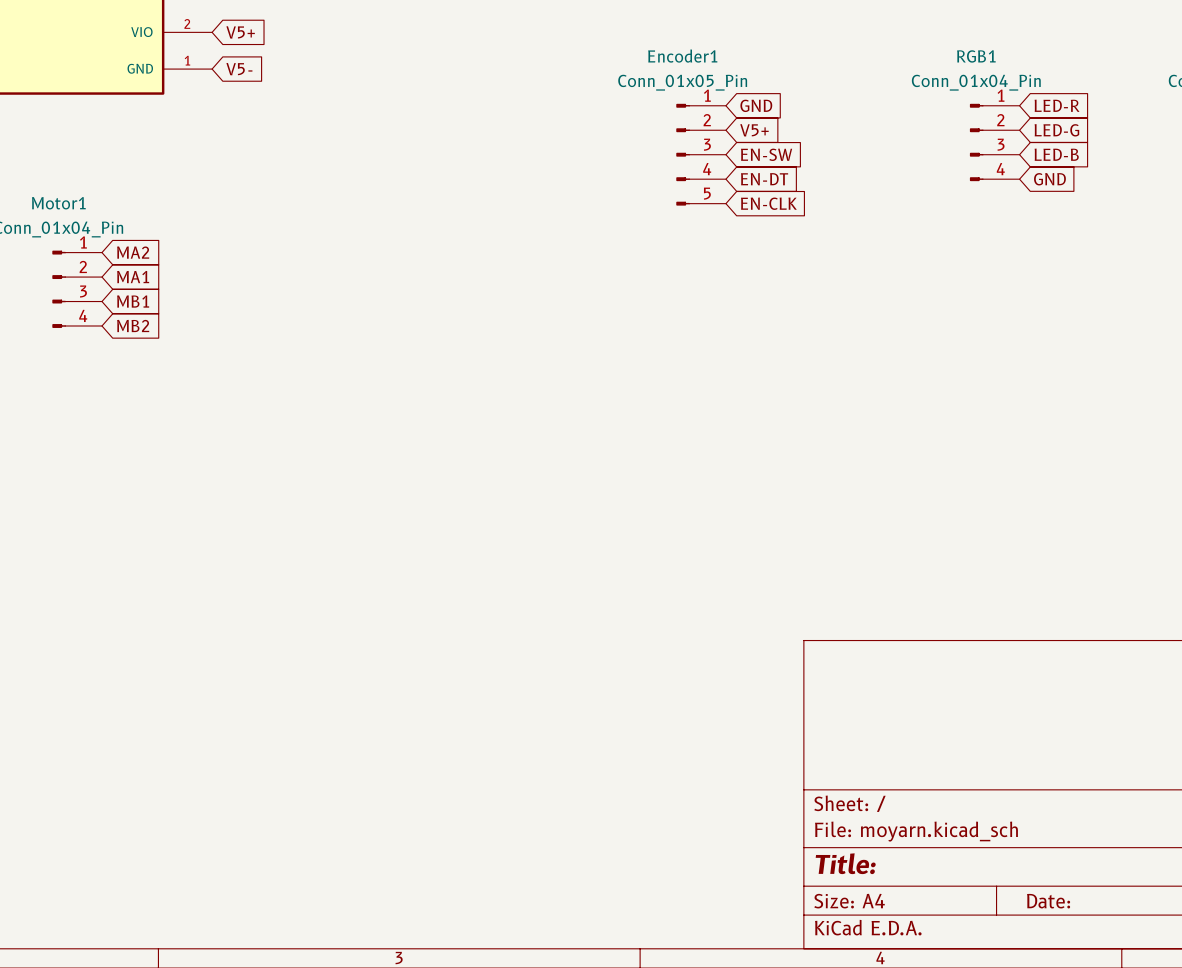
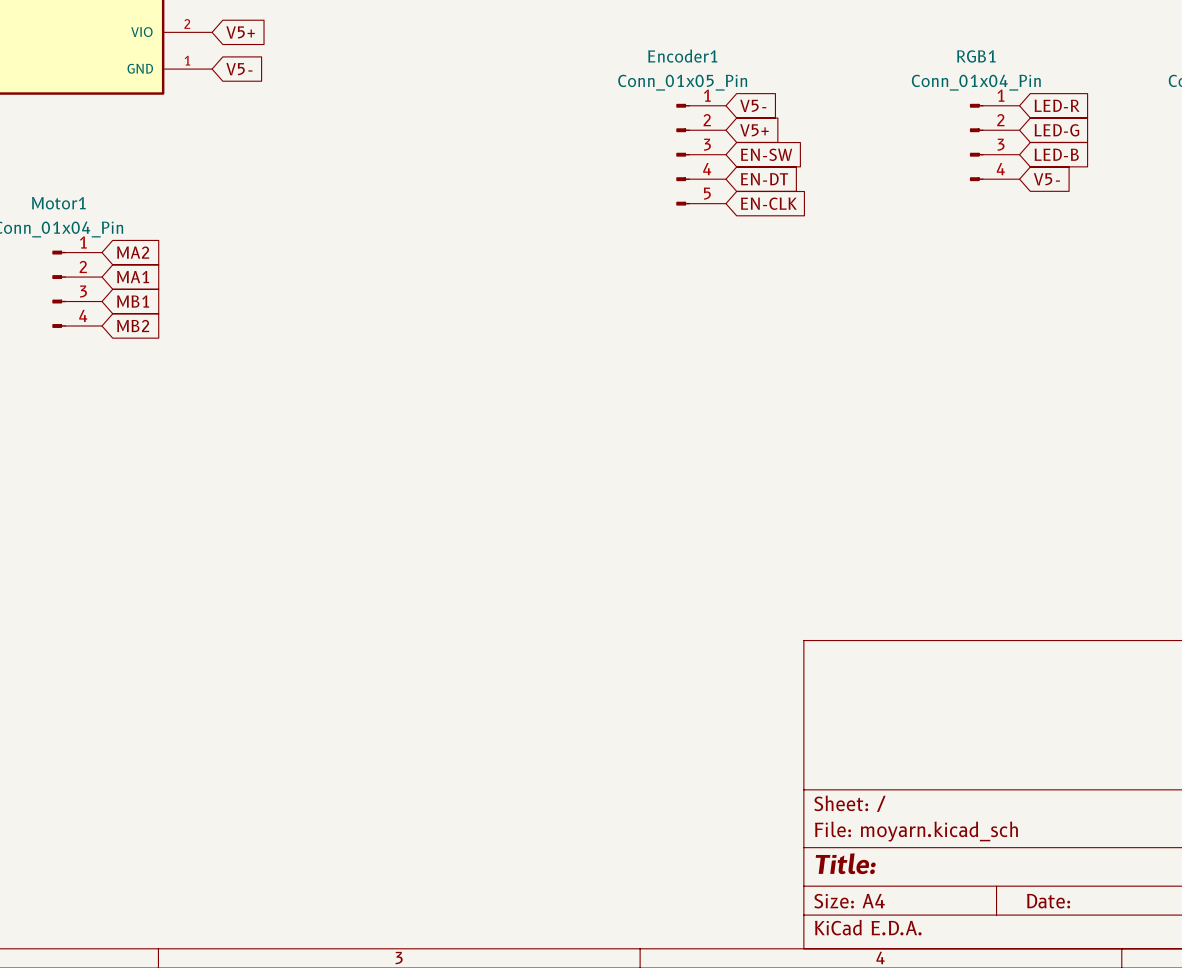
global label: GND (756, 105) -> V5- (753, 105)
global label: GND (1049, 179) -> V5- (1046, 179)

